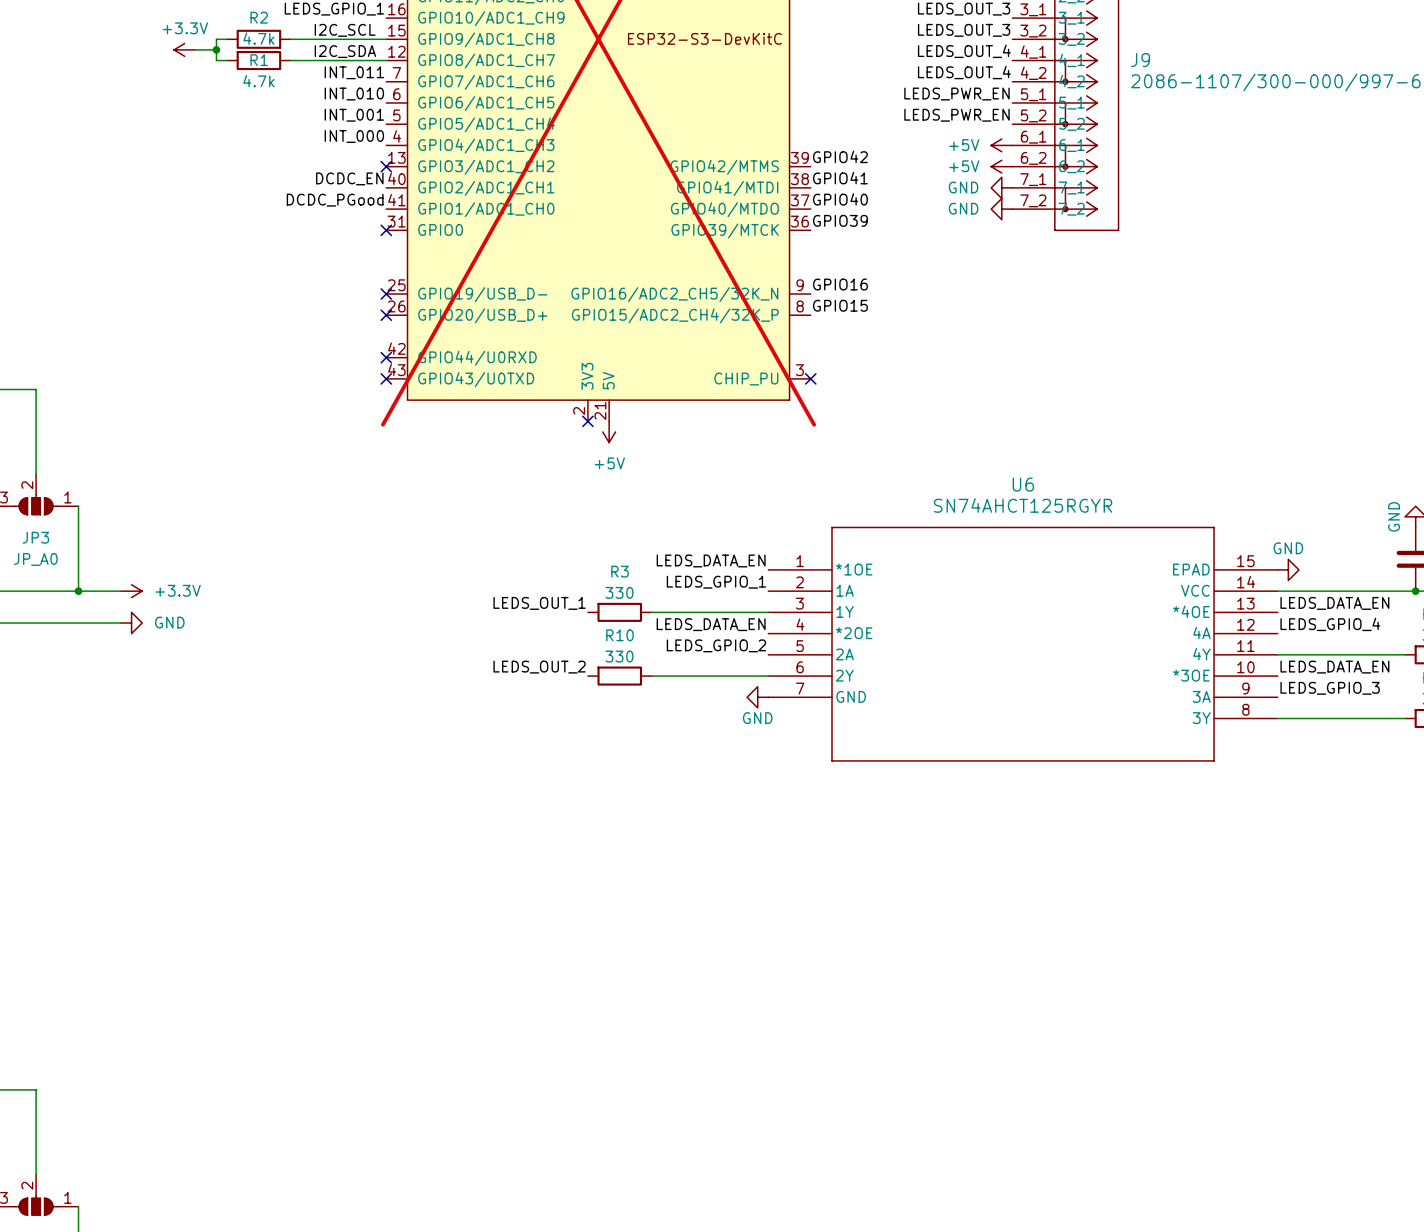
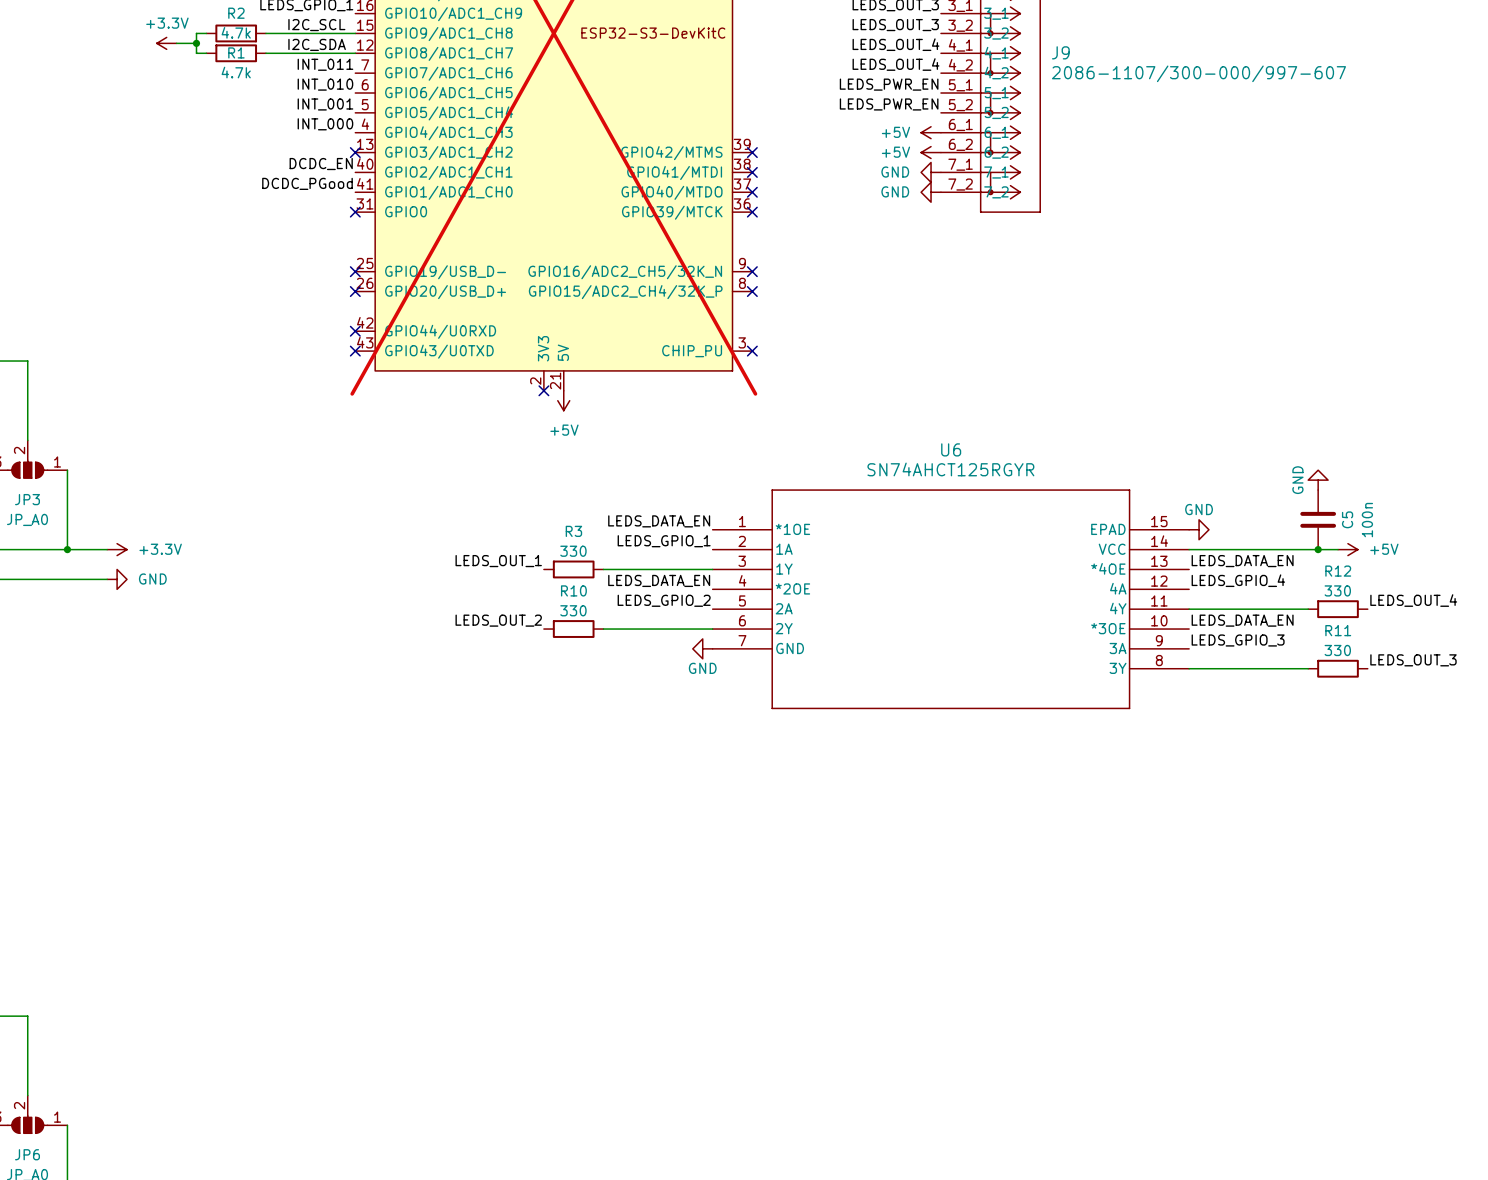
label: GPIO42 (840, 156) -> none
no-connect mark: none -> (752, 152)
label: GPIO41 (840, 178) -> none
no-connect mark: none -> (752, 172)
label: GPIO40 (840, 199) -> none
no-connect mark: none -> (752, 192)
label: GPIO39 (840, 220) -> none
no-connect mark: none -> (752, 212)
label: GPIO16 (840, 284) -> none
no-connect mark: none -> (752, 271)
label: GPIO15 (840, 305) -> none
no-connect mark: none -> (752, 291)

